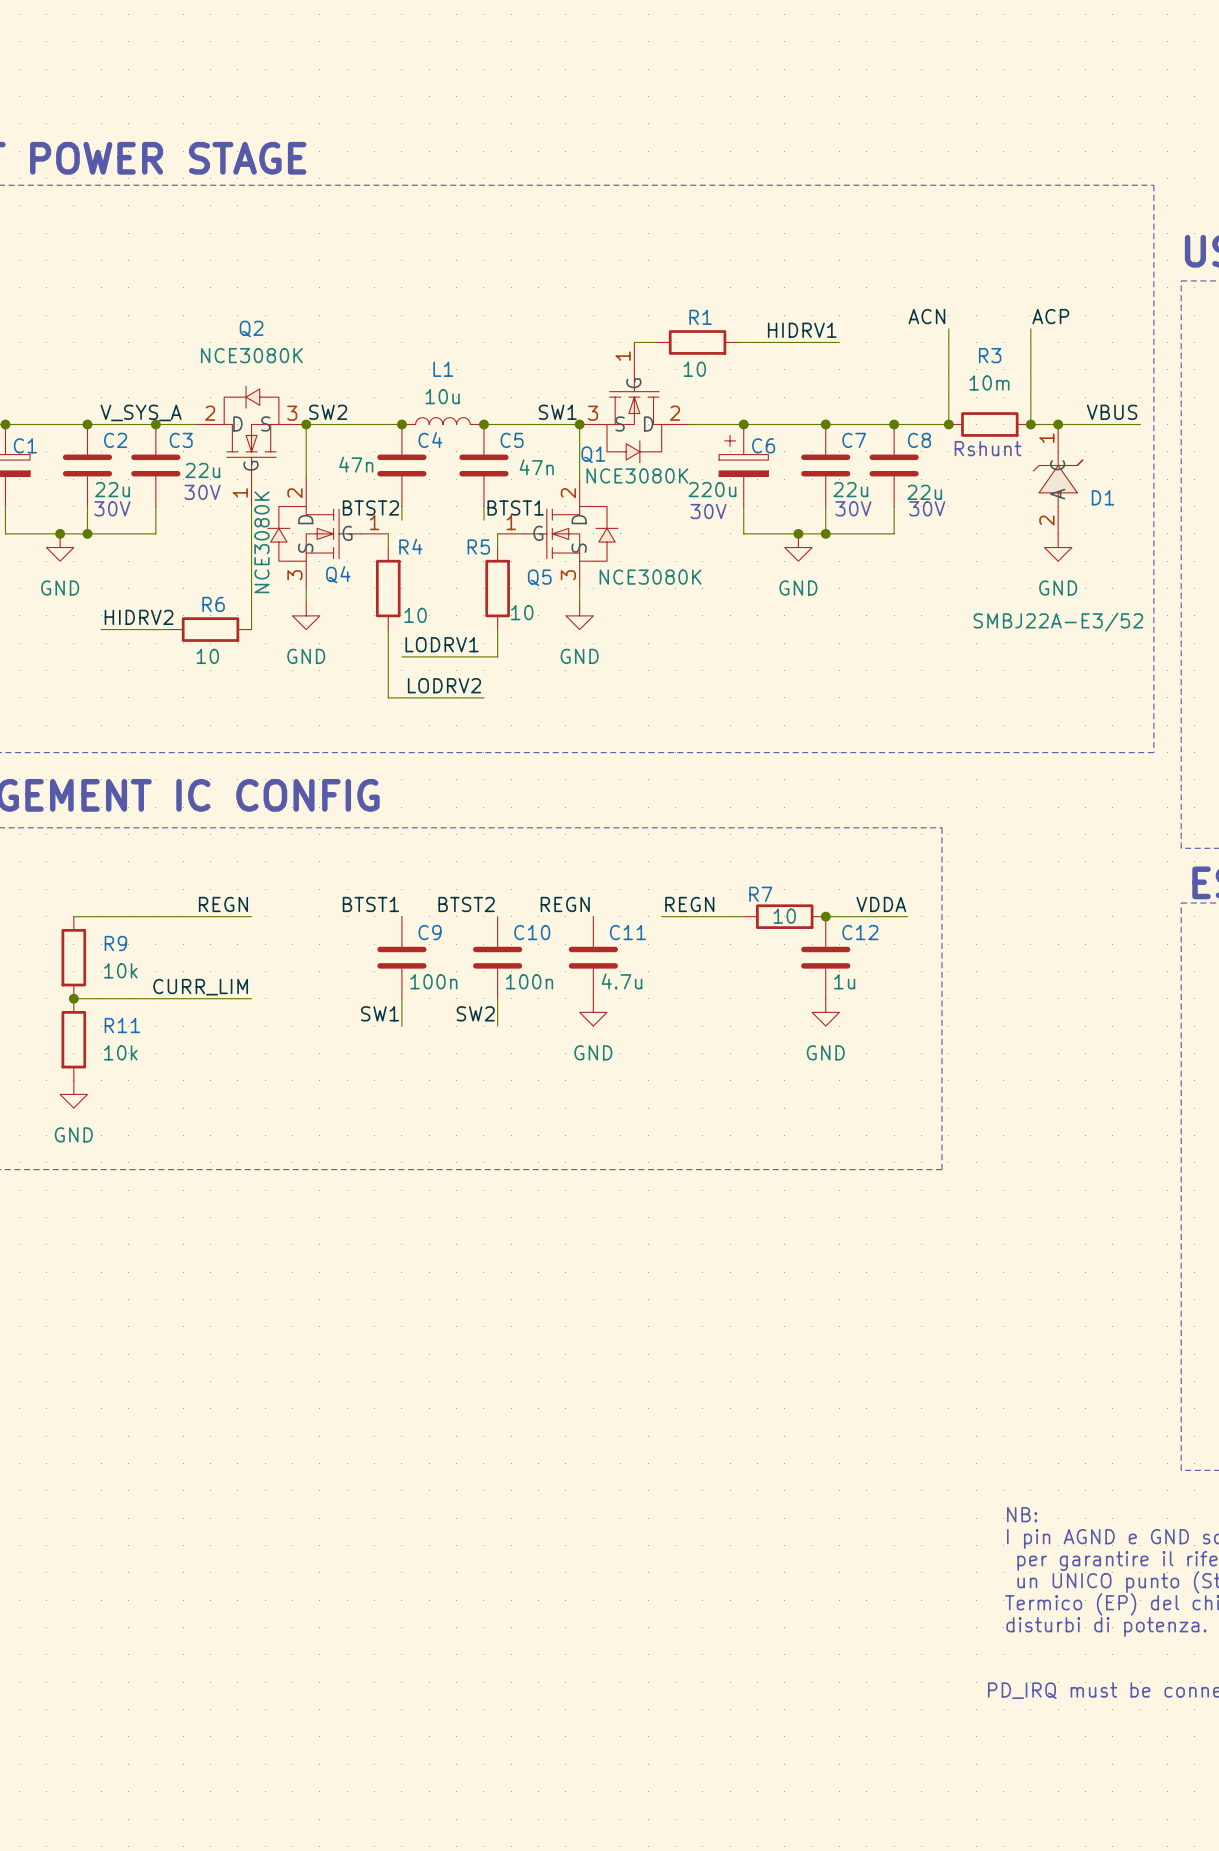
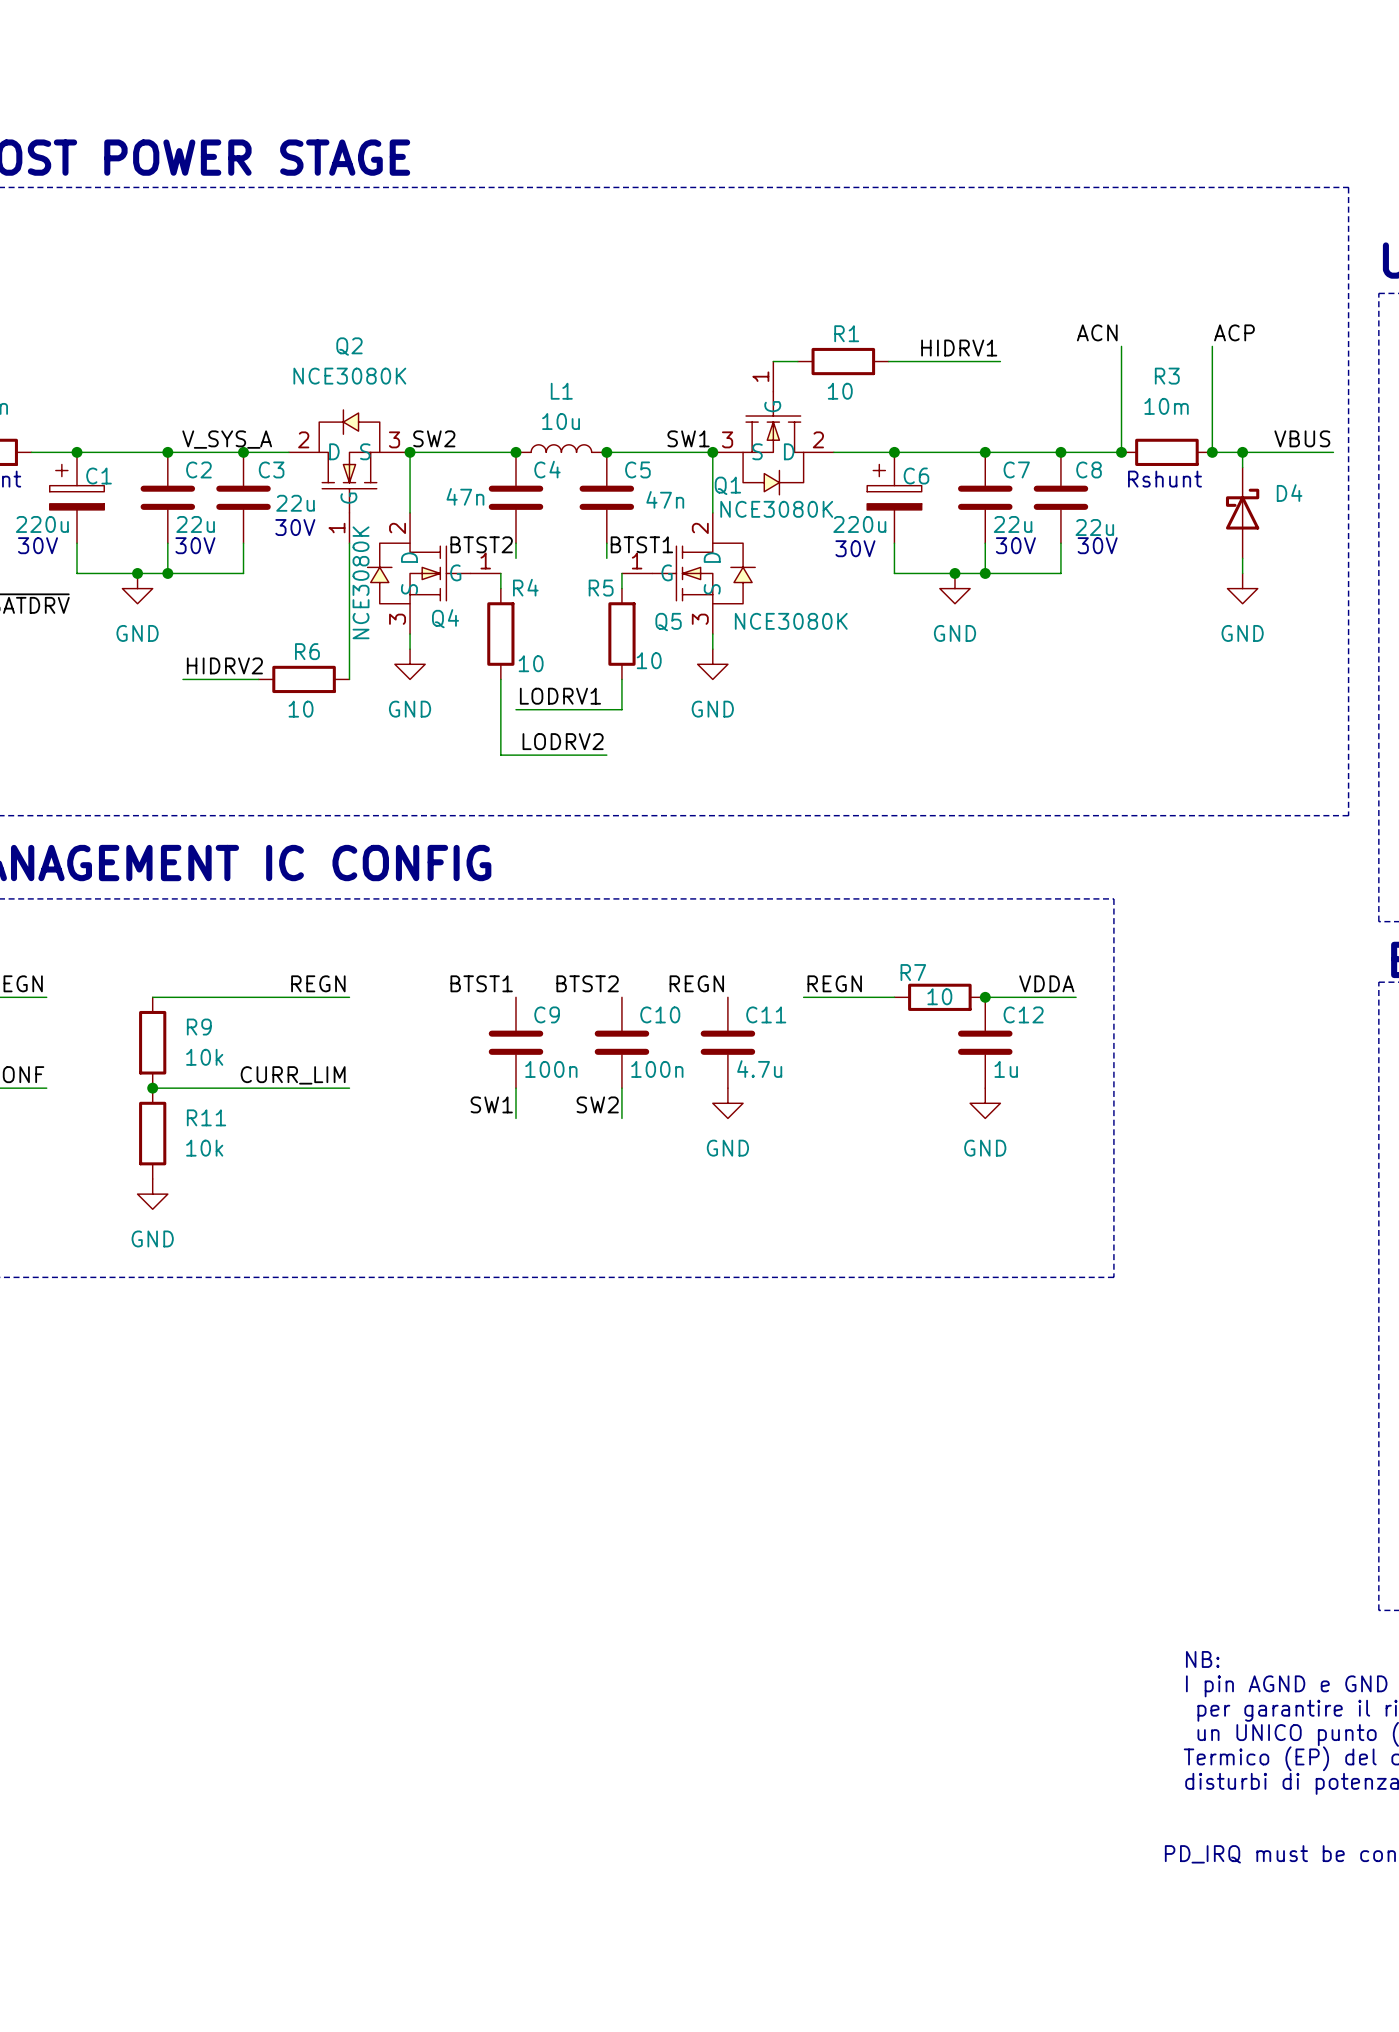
D1: SMBJ22A-E3/52 (1058, 479) -> none
D4: none -> (1242, 512)

